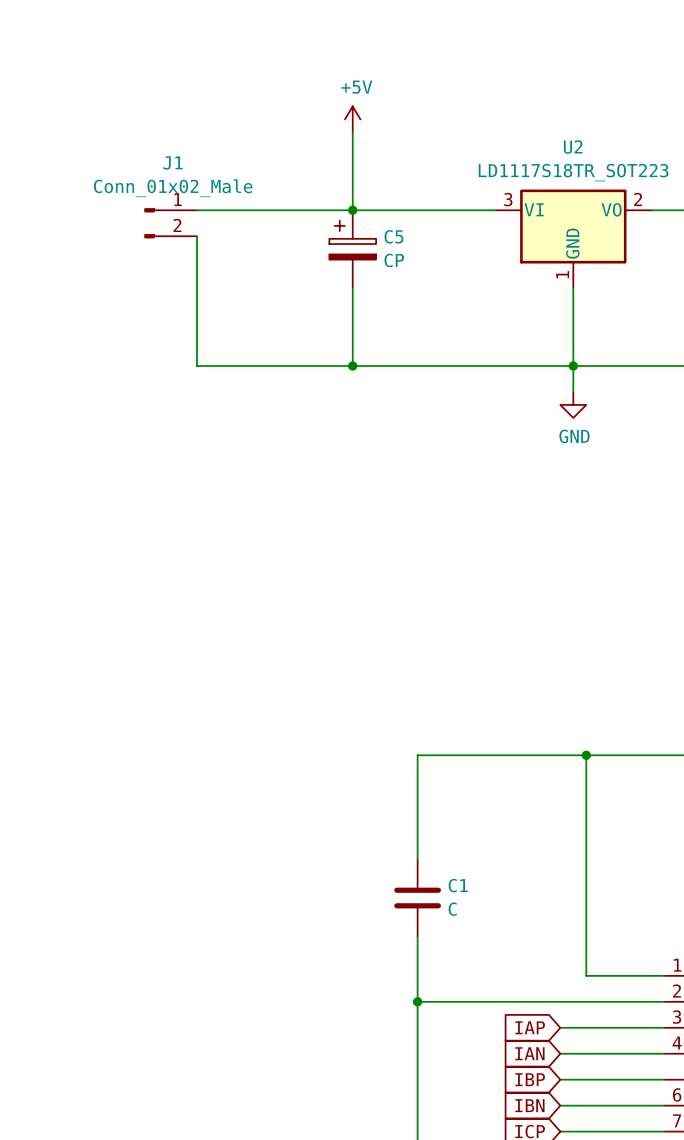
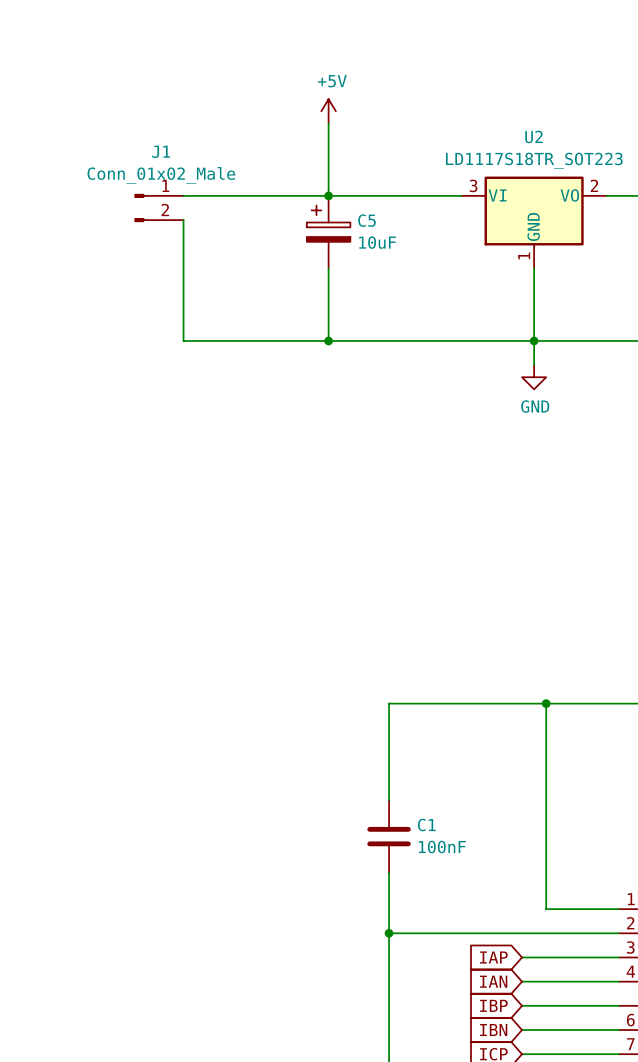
C5 value: CP (394, 260) -> 10uF (377, 242)
C1 value: C (452, 909) -> 100nF (442, 847)

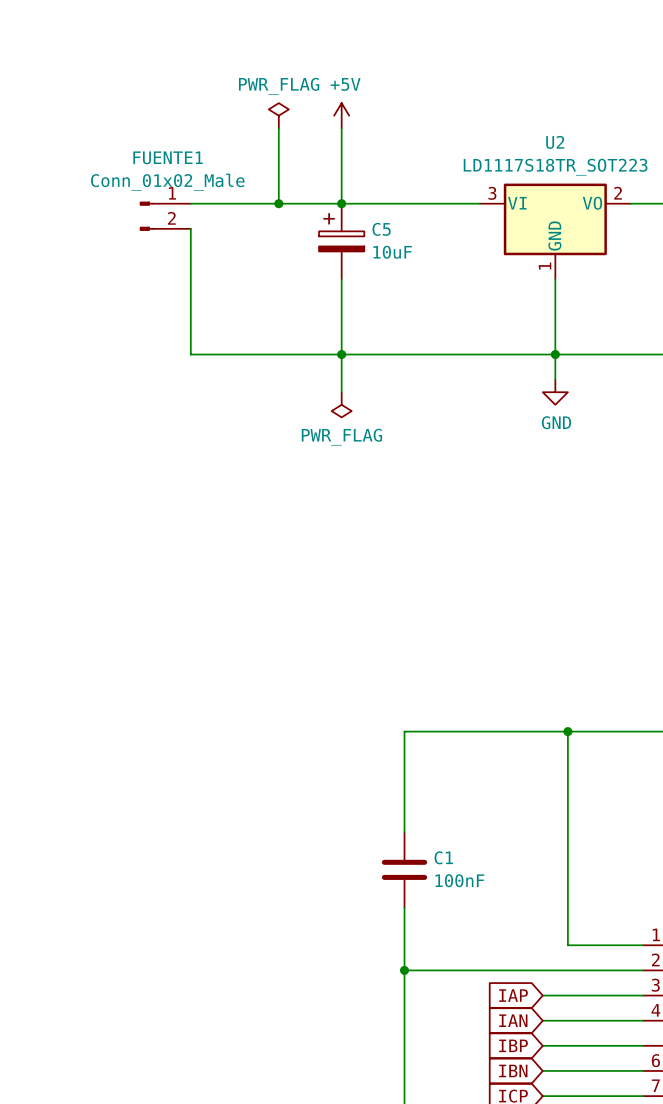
power symbol: none -> PWR_FLAG (278, 115)
wire: none -> (278, 128) (278, 203)
J1 name: J1 (161, 151) -> FUENTE1 (168, 157)
junction: none -> (278, 203)
wire: none -> (341, 354) (341, 392)
power symbol: none -> PWR_FLAG (341, 404)

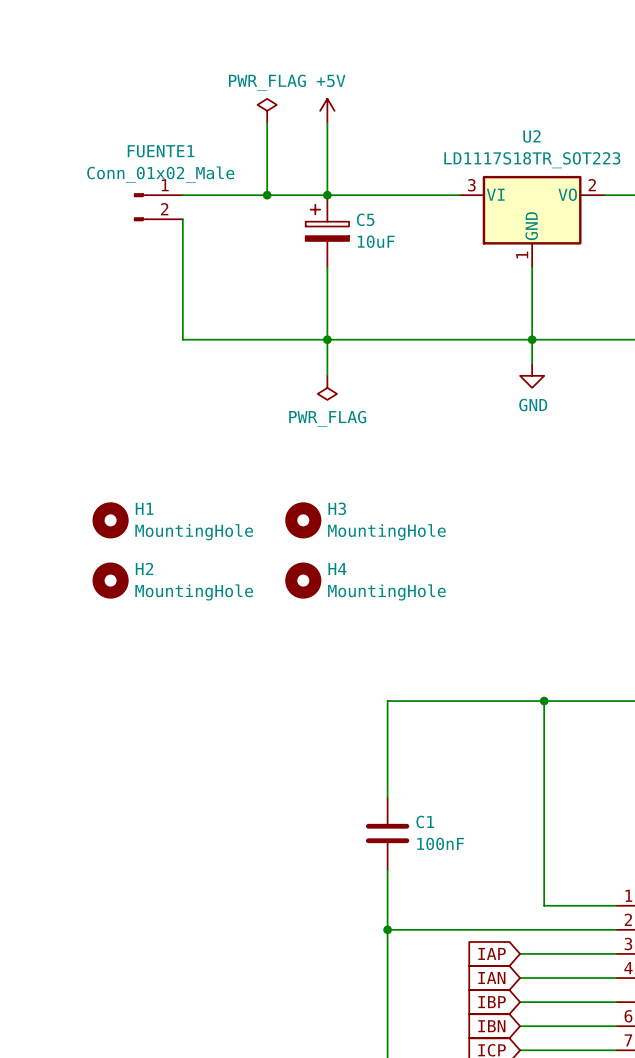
H1: none -> MountingHole (110, 520)
H3: none -> MountingHole (303, 520)
H2: none -> MountingHole (110, 580)
H4: none -> MountingHole (303, 580)

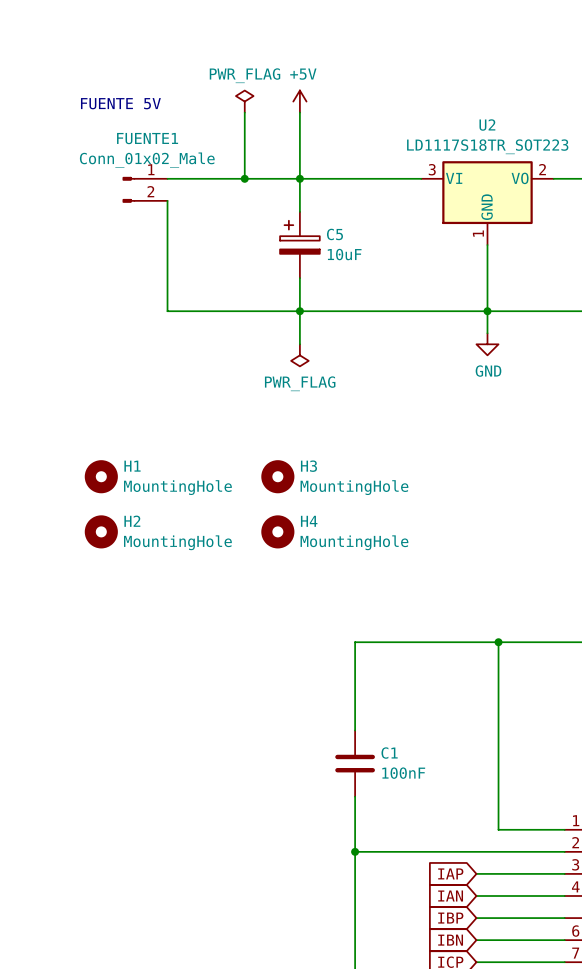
text: none -> FUENTE 5V (120, 103)
C5 position: (327, 231) -> (299, 245)

